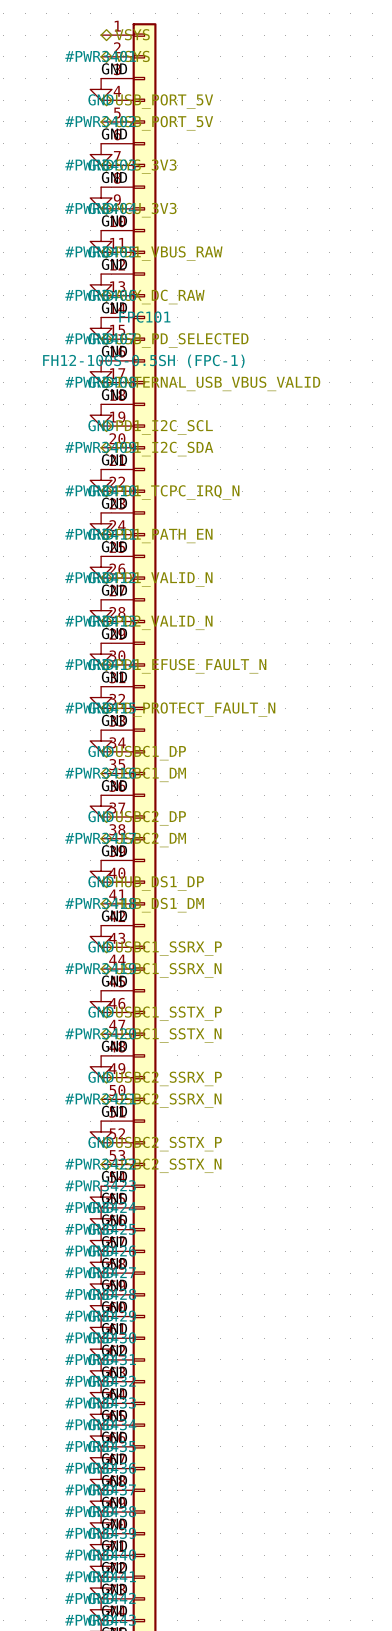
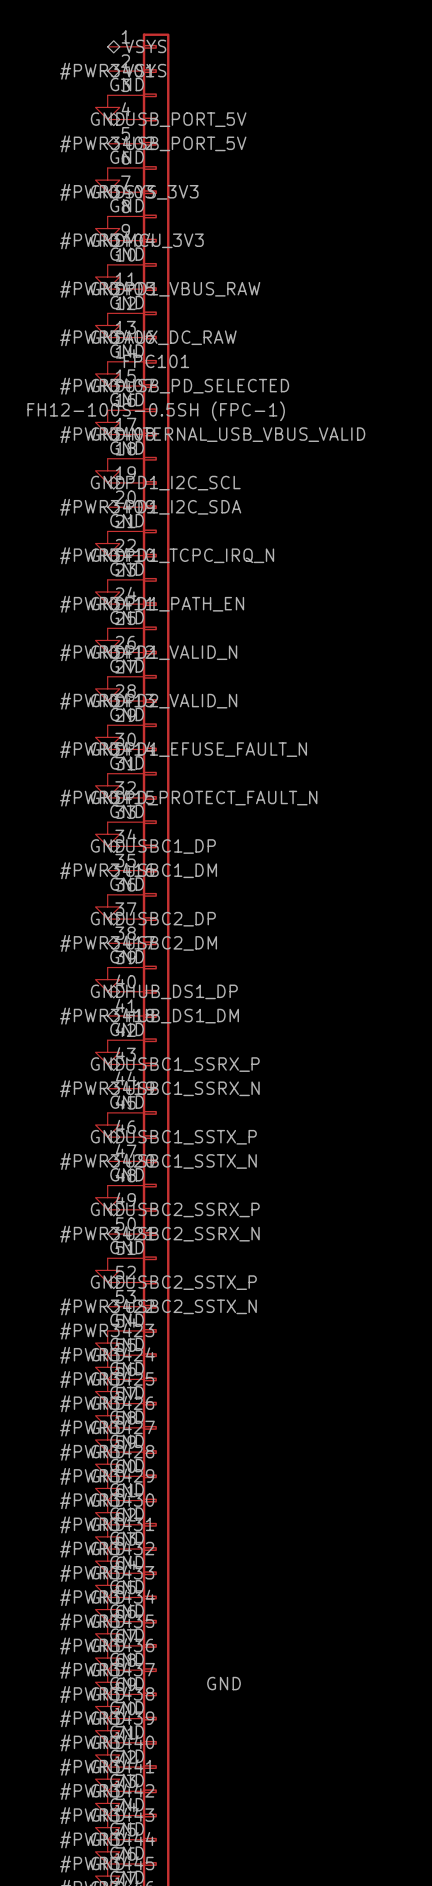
label: none -> GND (224, 1683)

